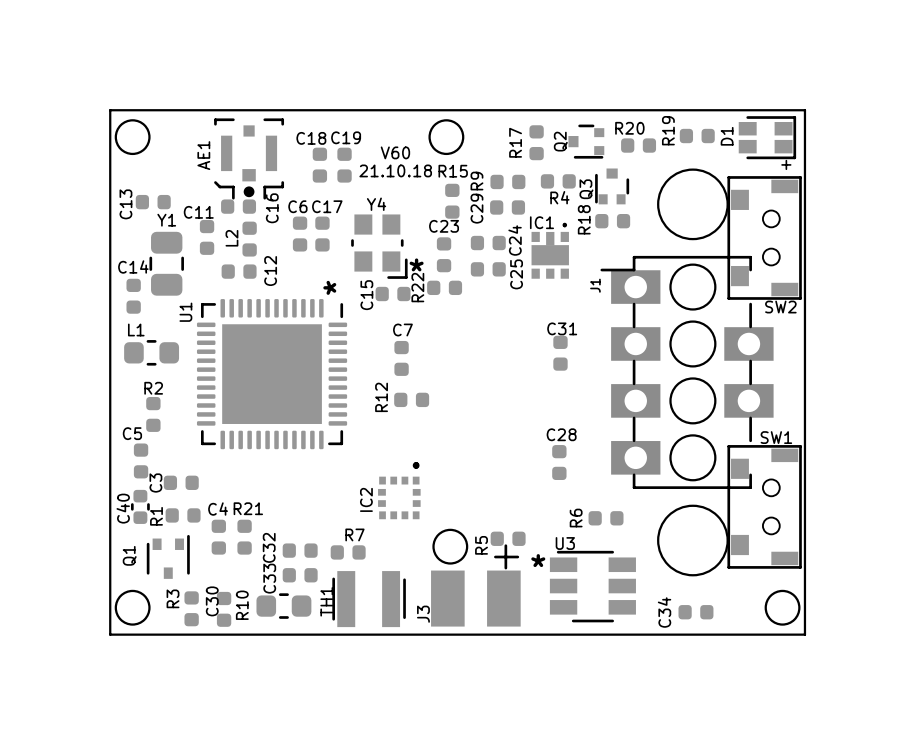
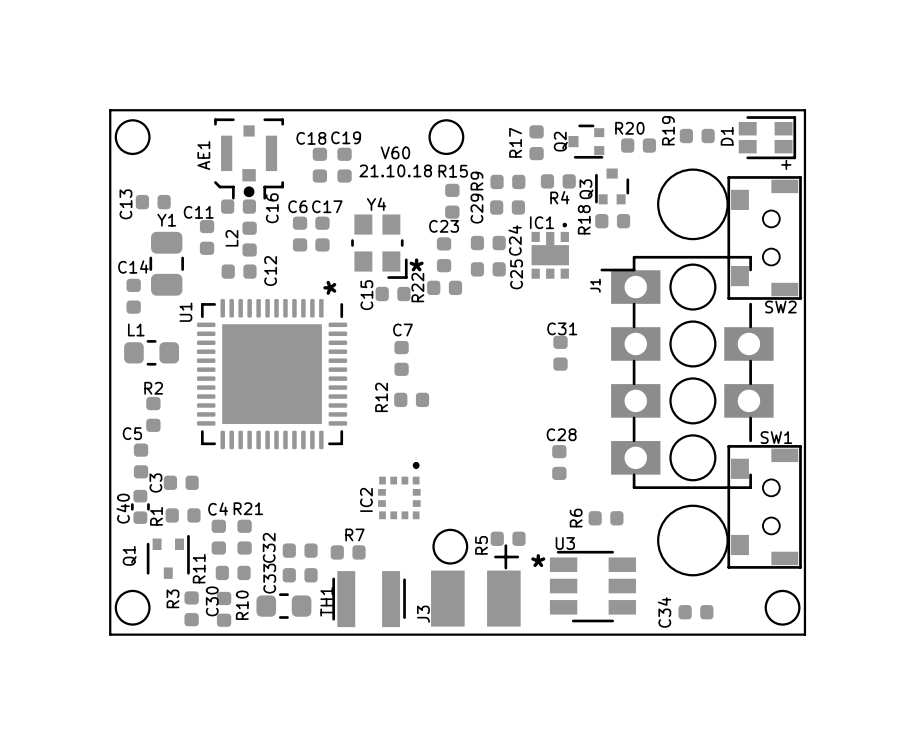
R11: none -> (233, 572)

